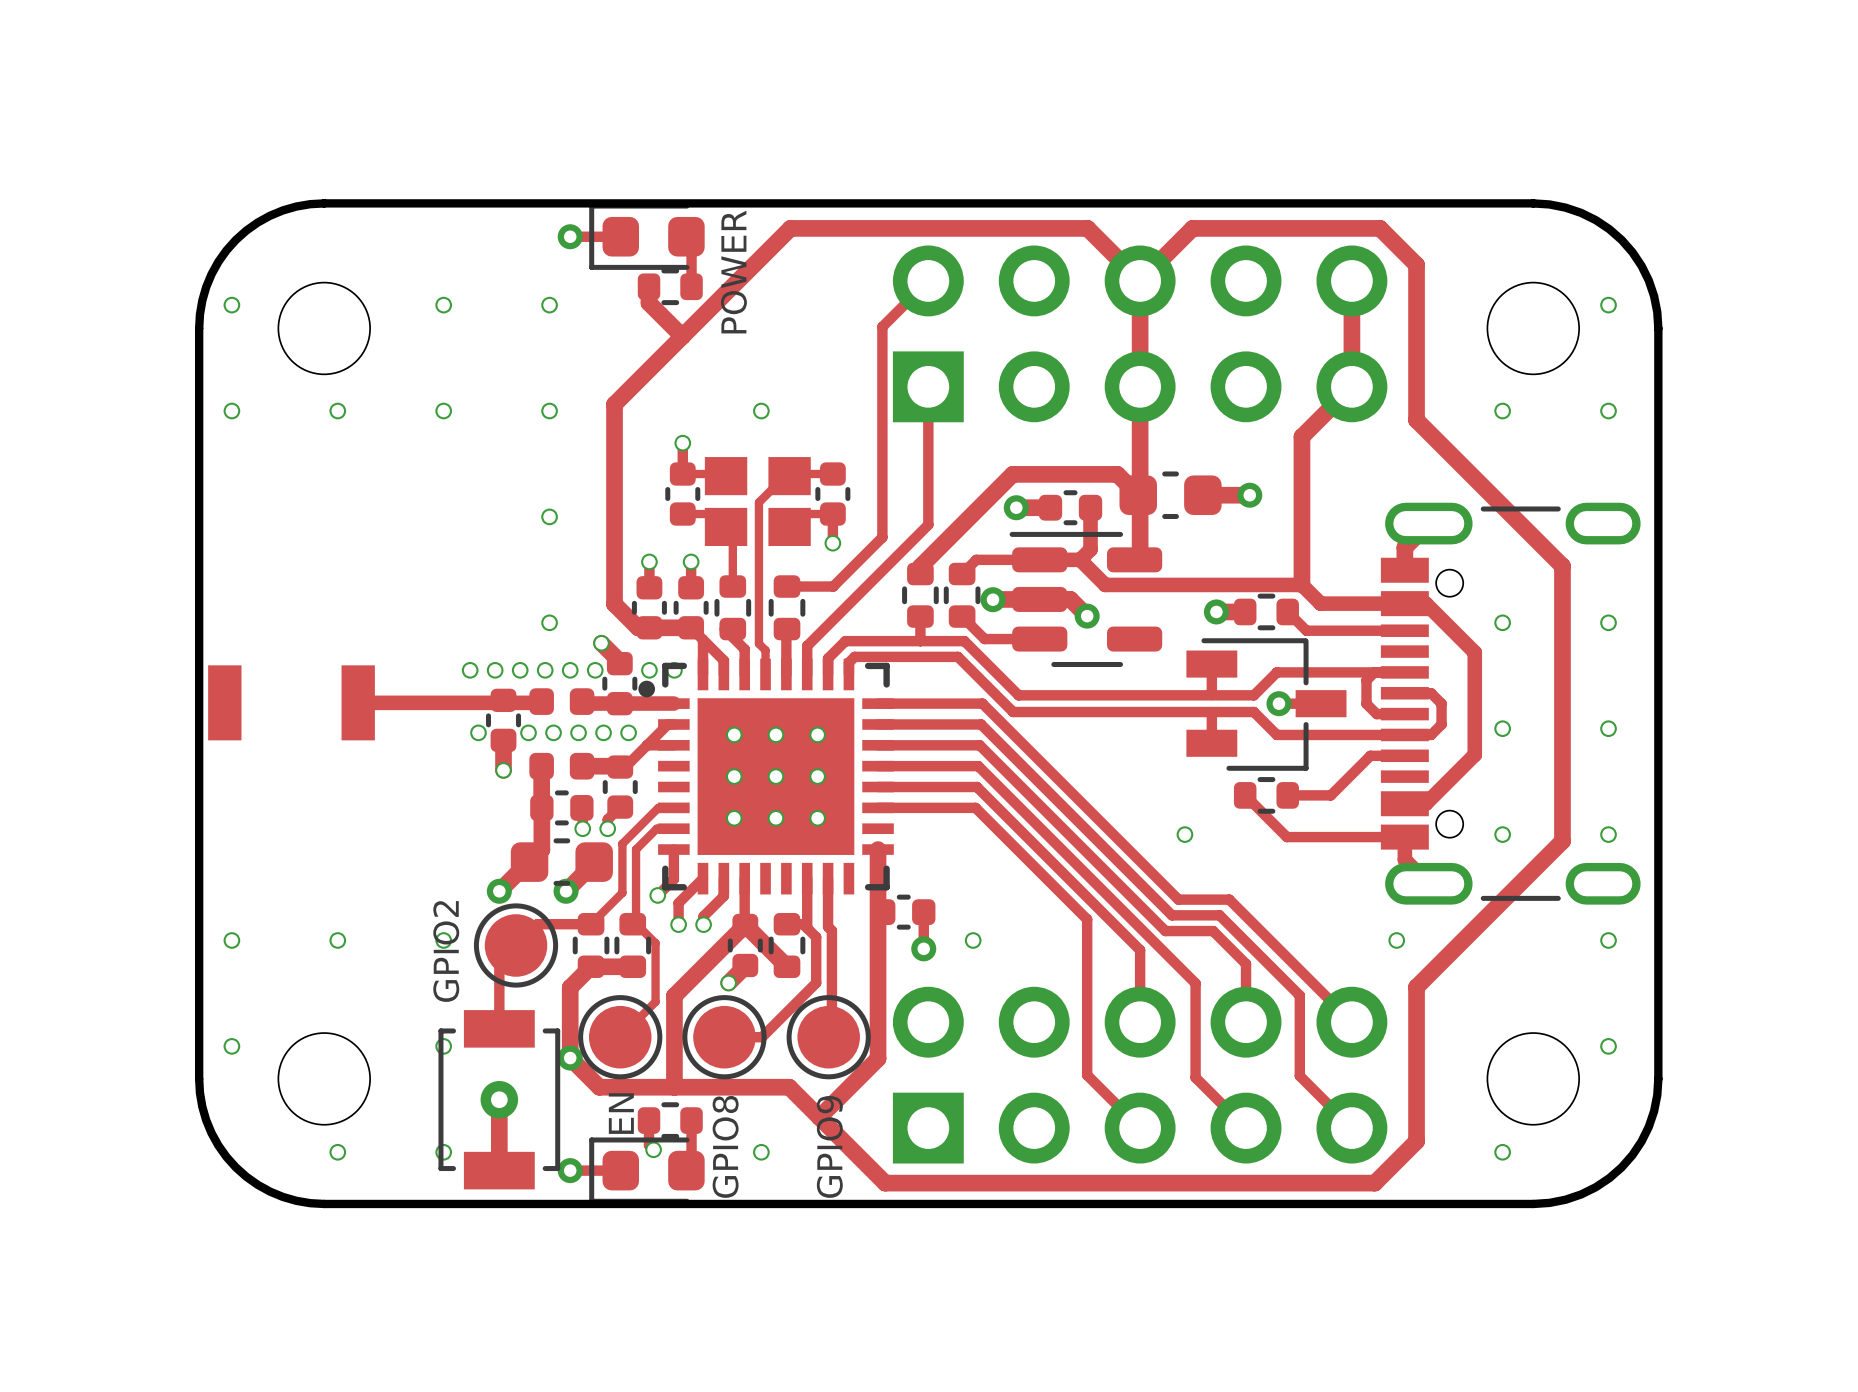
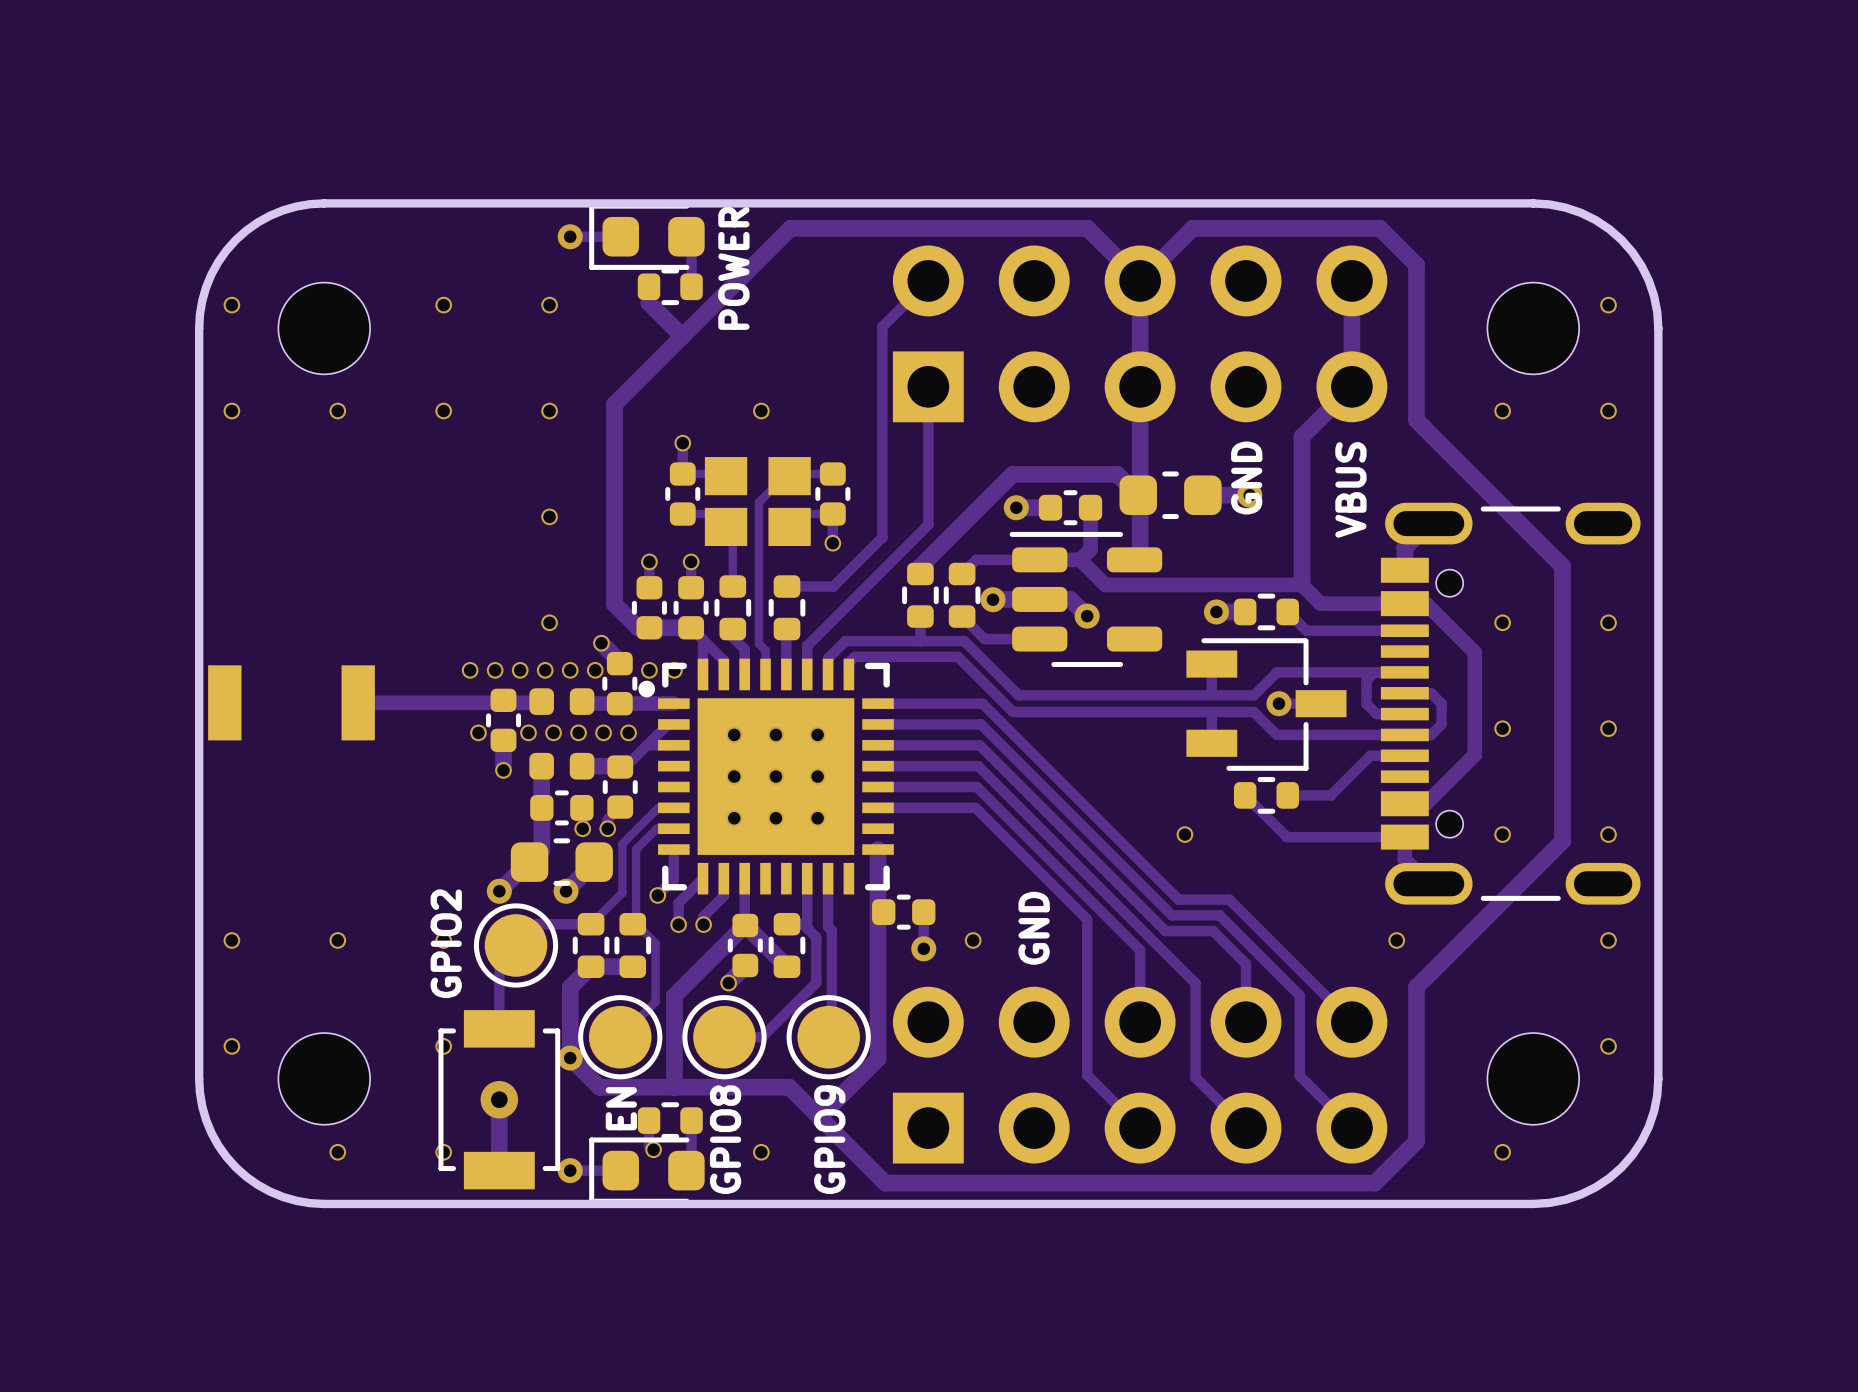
text: none -> GND (1246, 478)
text: none -> VBUS (1350, 489)
text: none -> GND (1034, 928)

